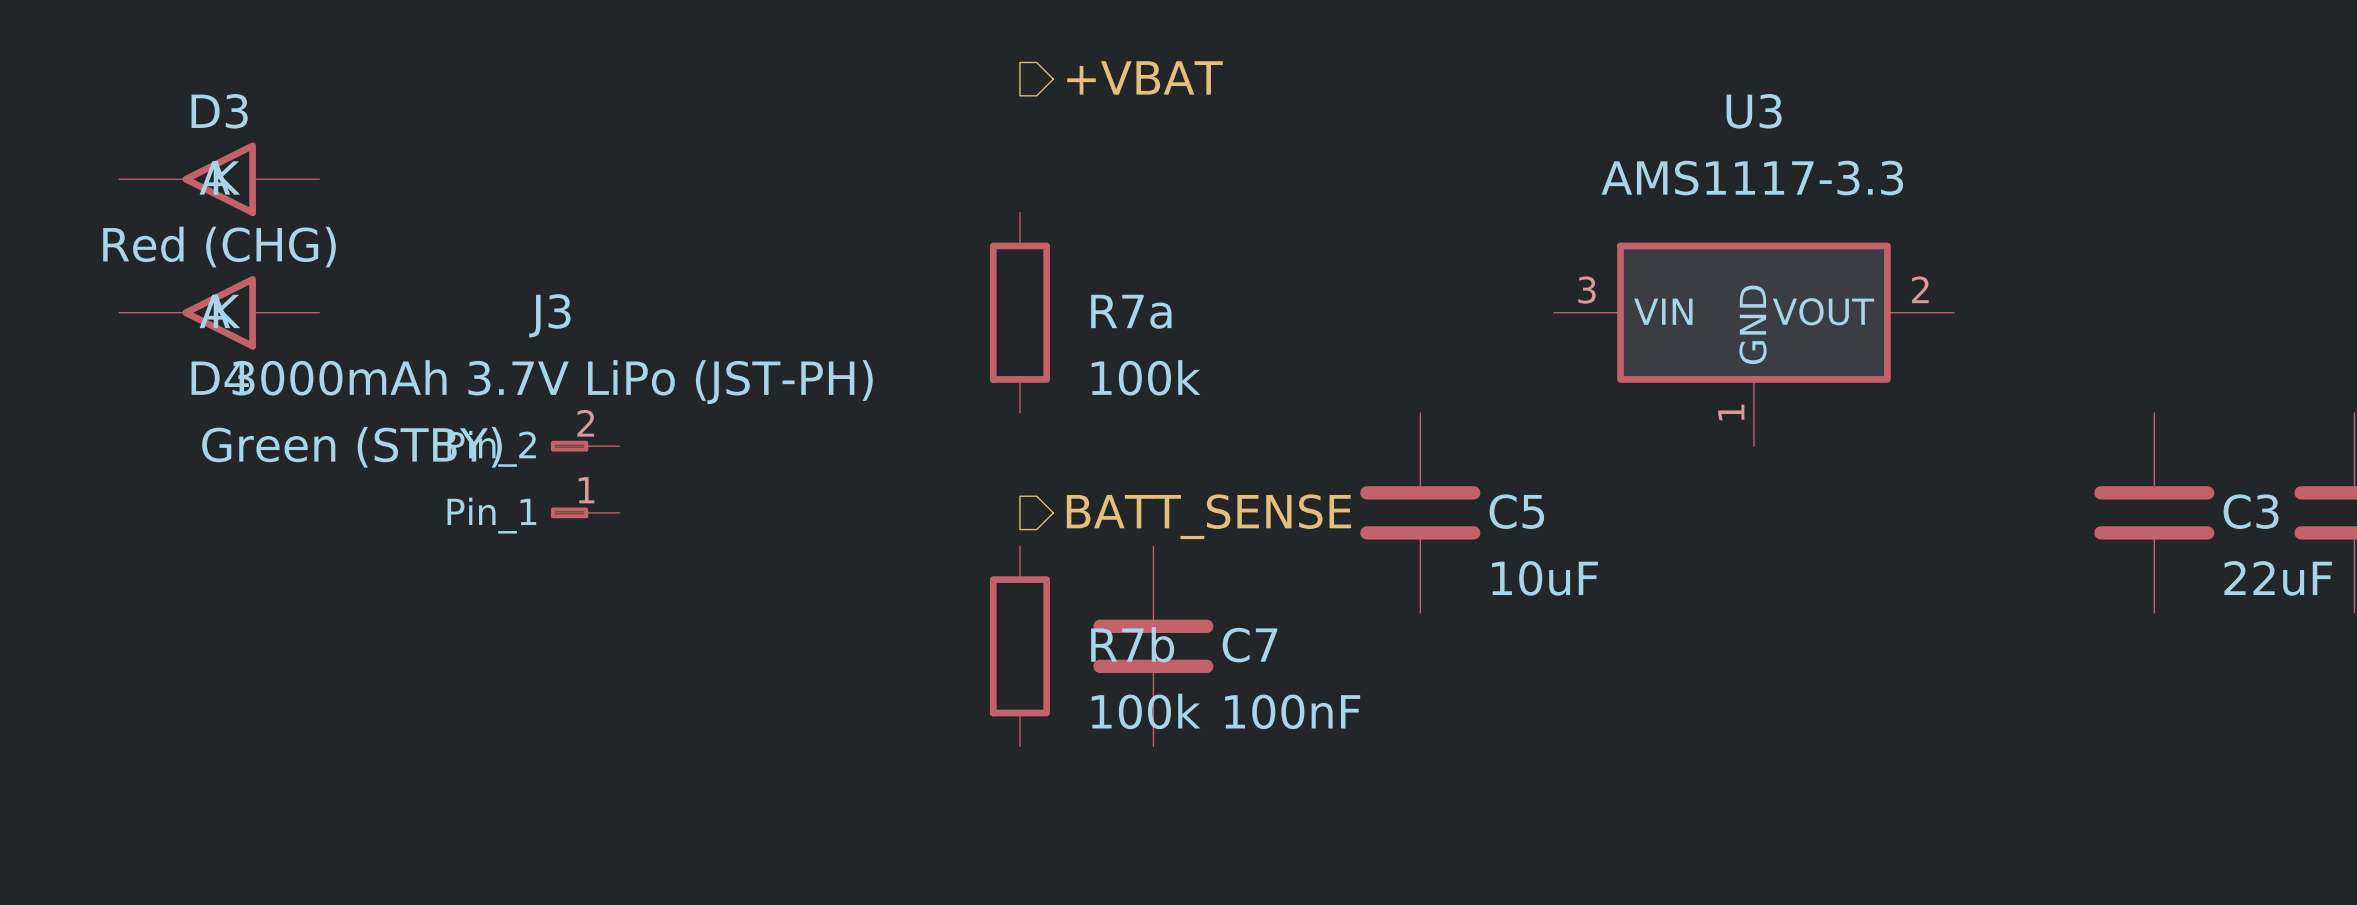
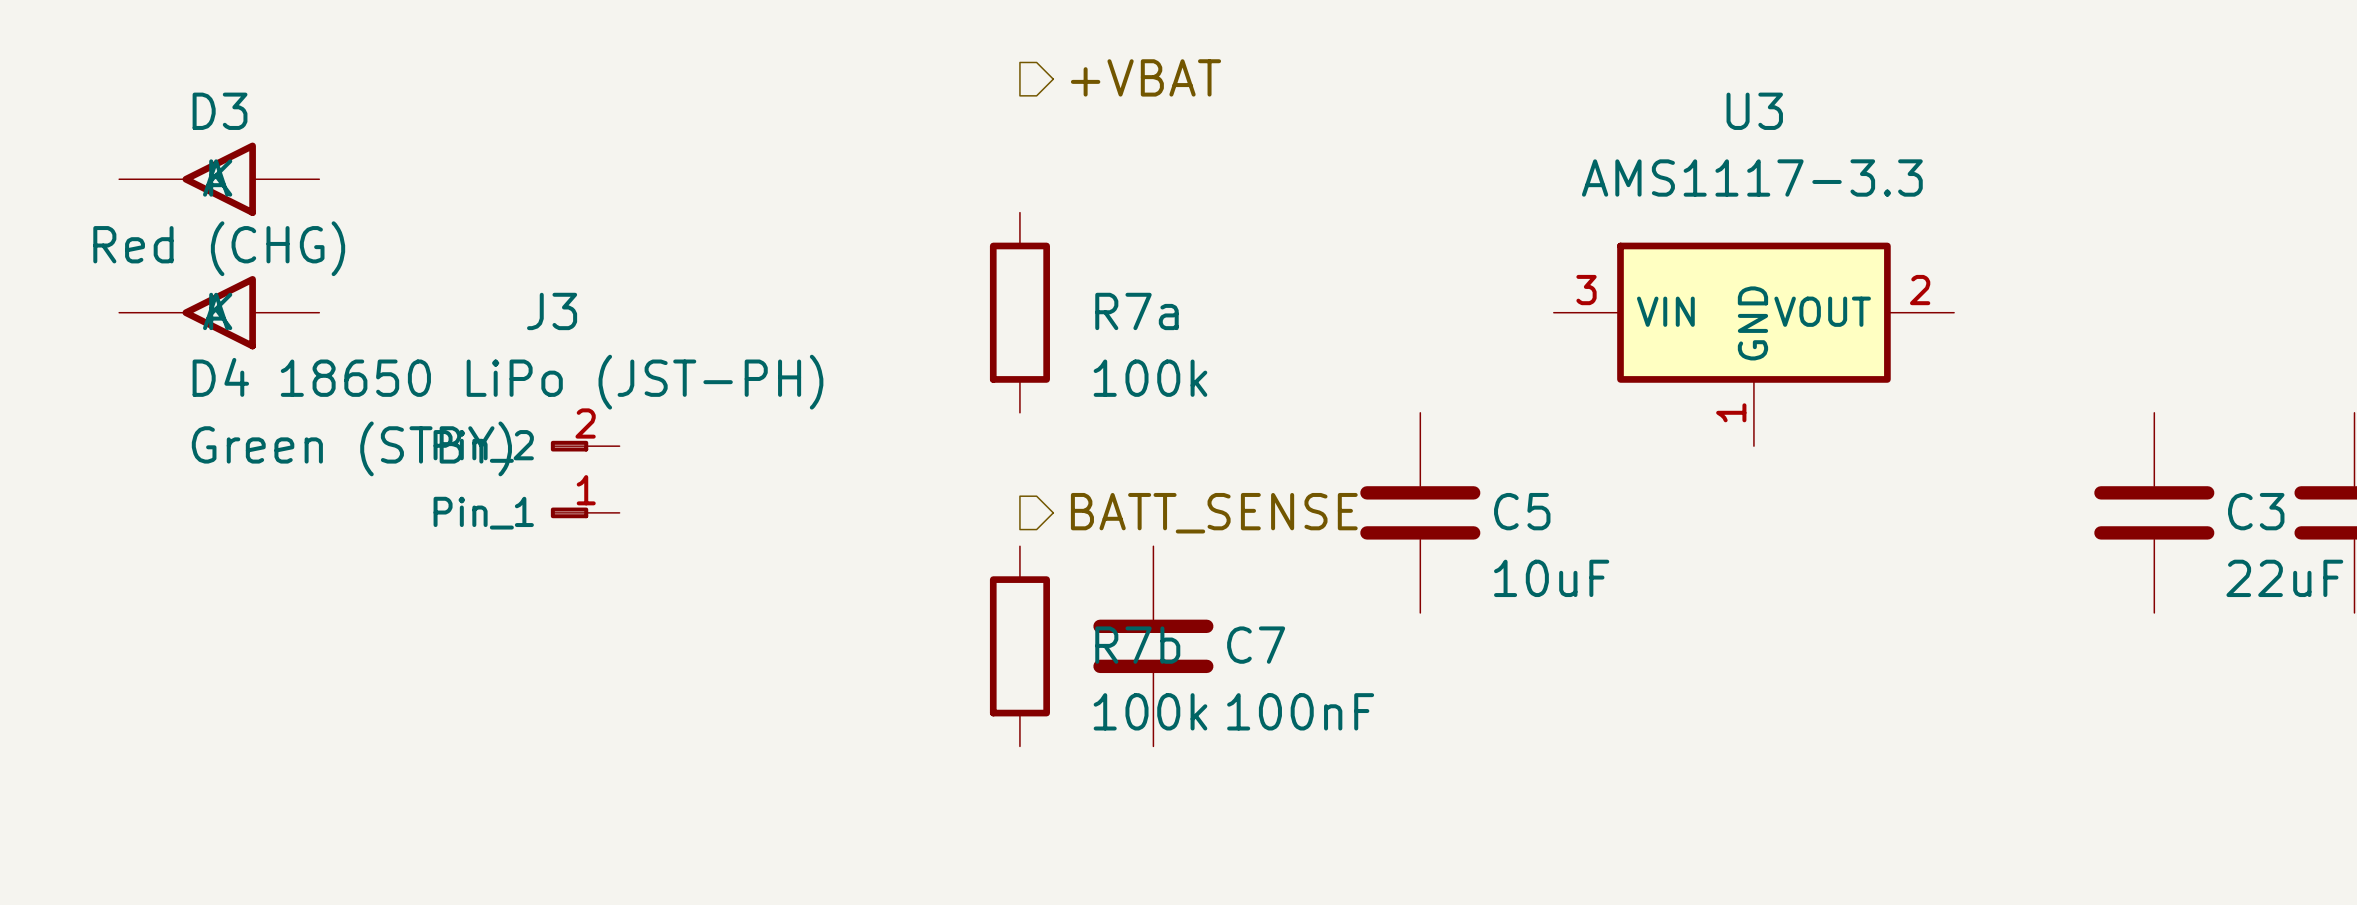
J3 value: 3000mAh 3.7V LiPo (JST-PH) (552, 382) -> 18650 LiPo (JST-PH) (552, 382)

